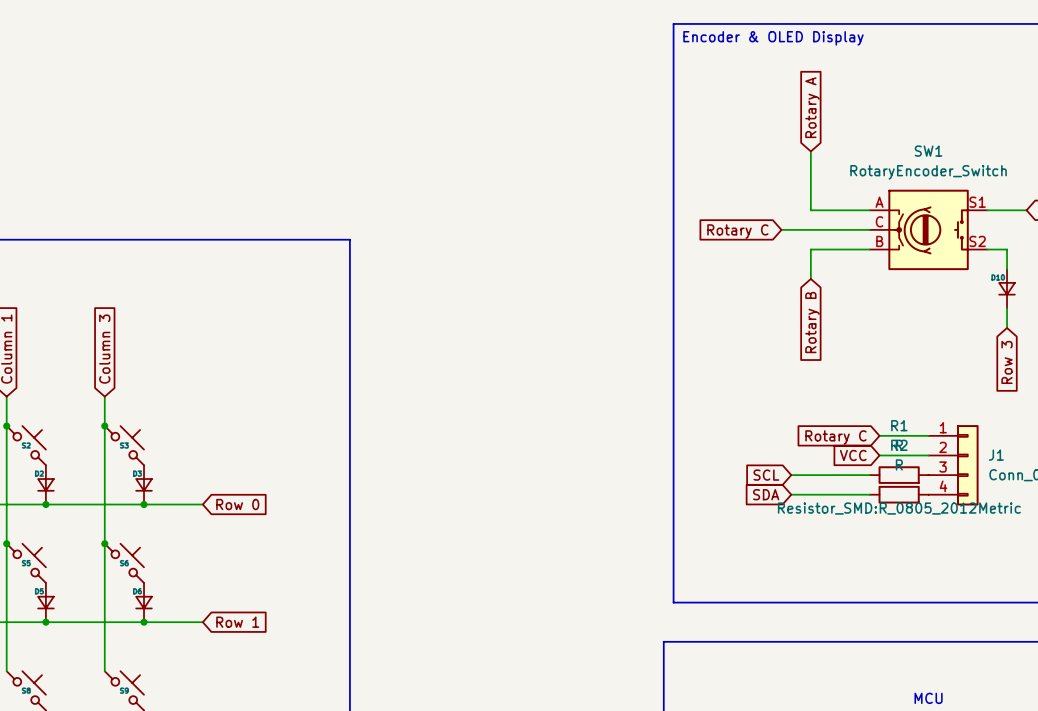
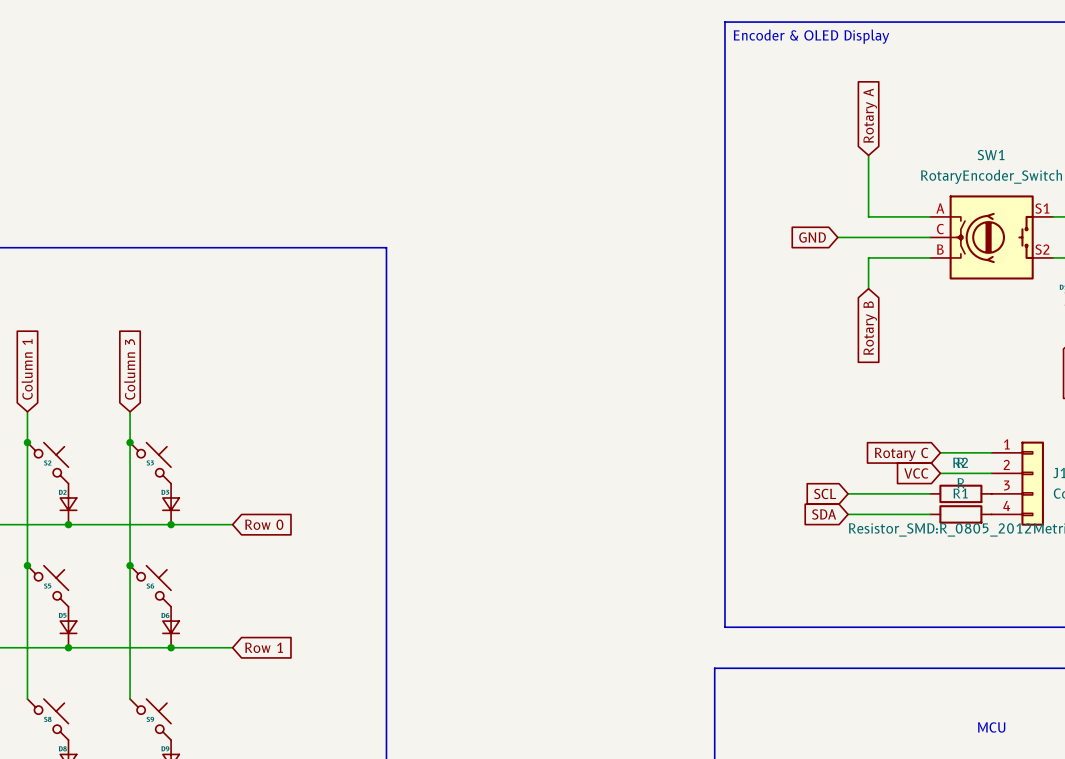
global label: Rotary C (737, 231) -> GND (812, 237)
R1 name position: R1 (899, 425) -> R1 (960, 493)

